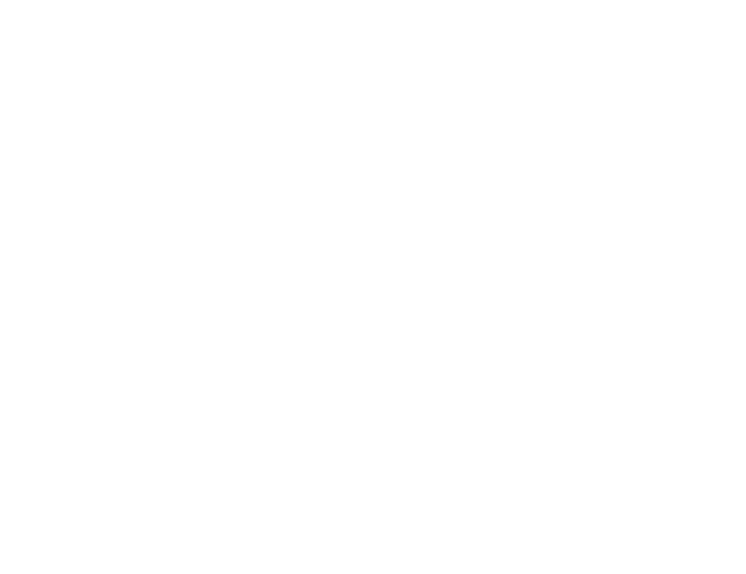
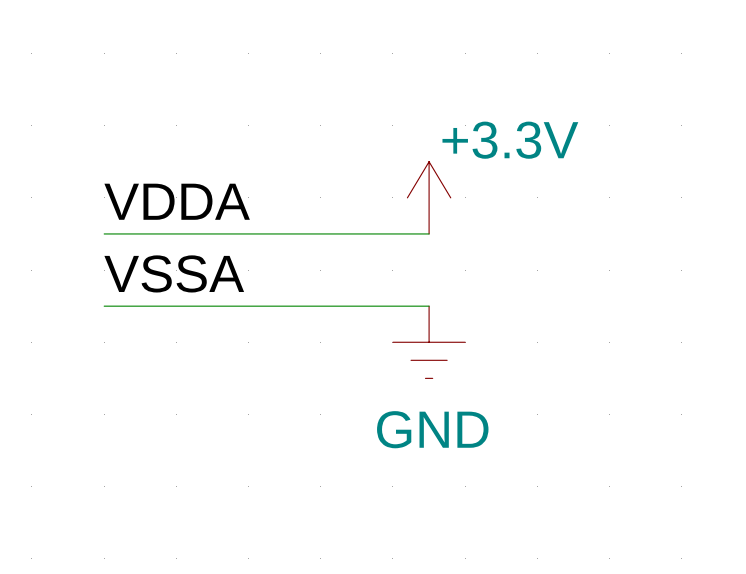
power symbol: none -> +3.3V (429, 197)
label: none -> VDDA (177, 201)
wire: none -> (104, 233) (429, 233)
label: none -> VSSA (174, 273)
wire: none -> (104, 306) (429, 306)
power symbol: none -> GND (429, 342)

